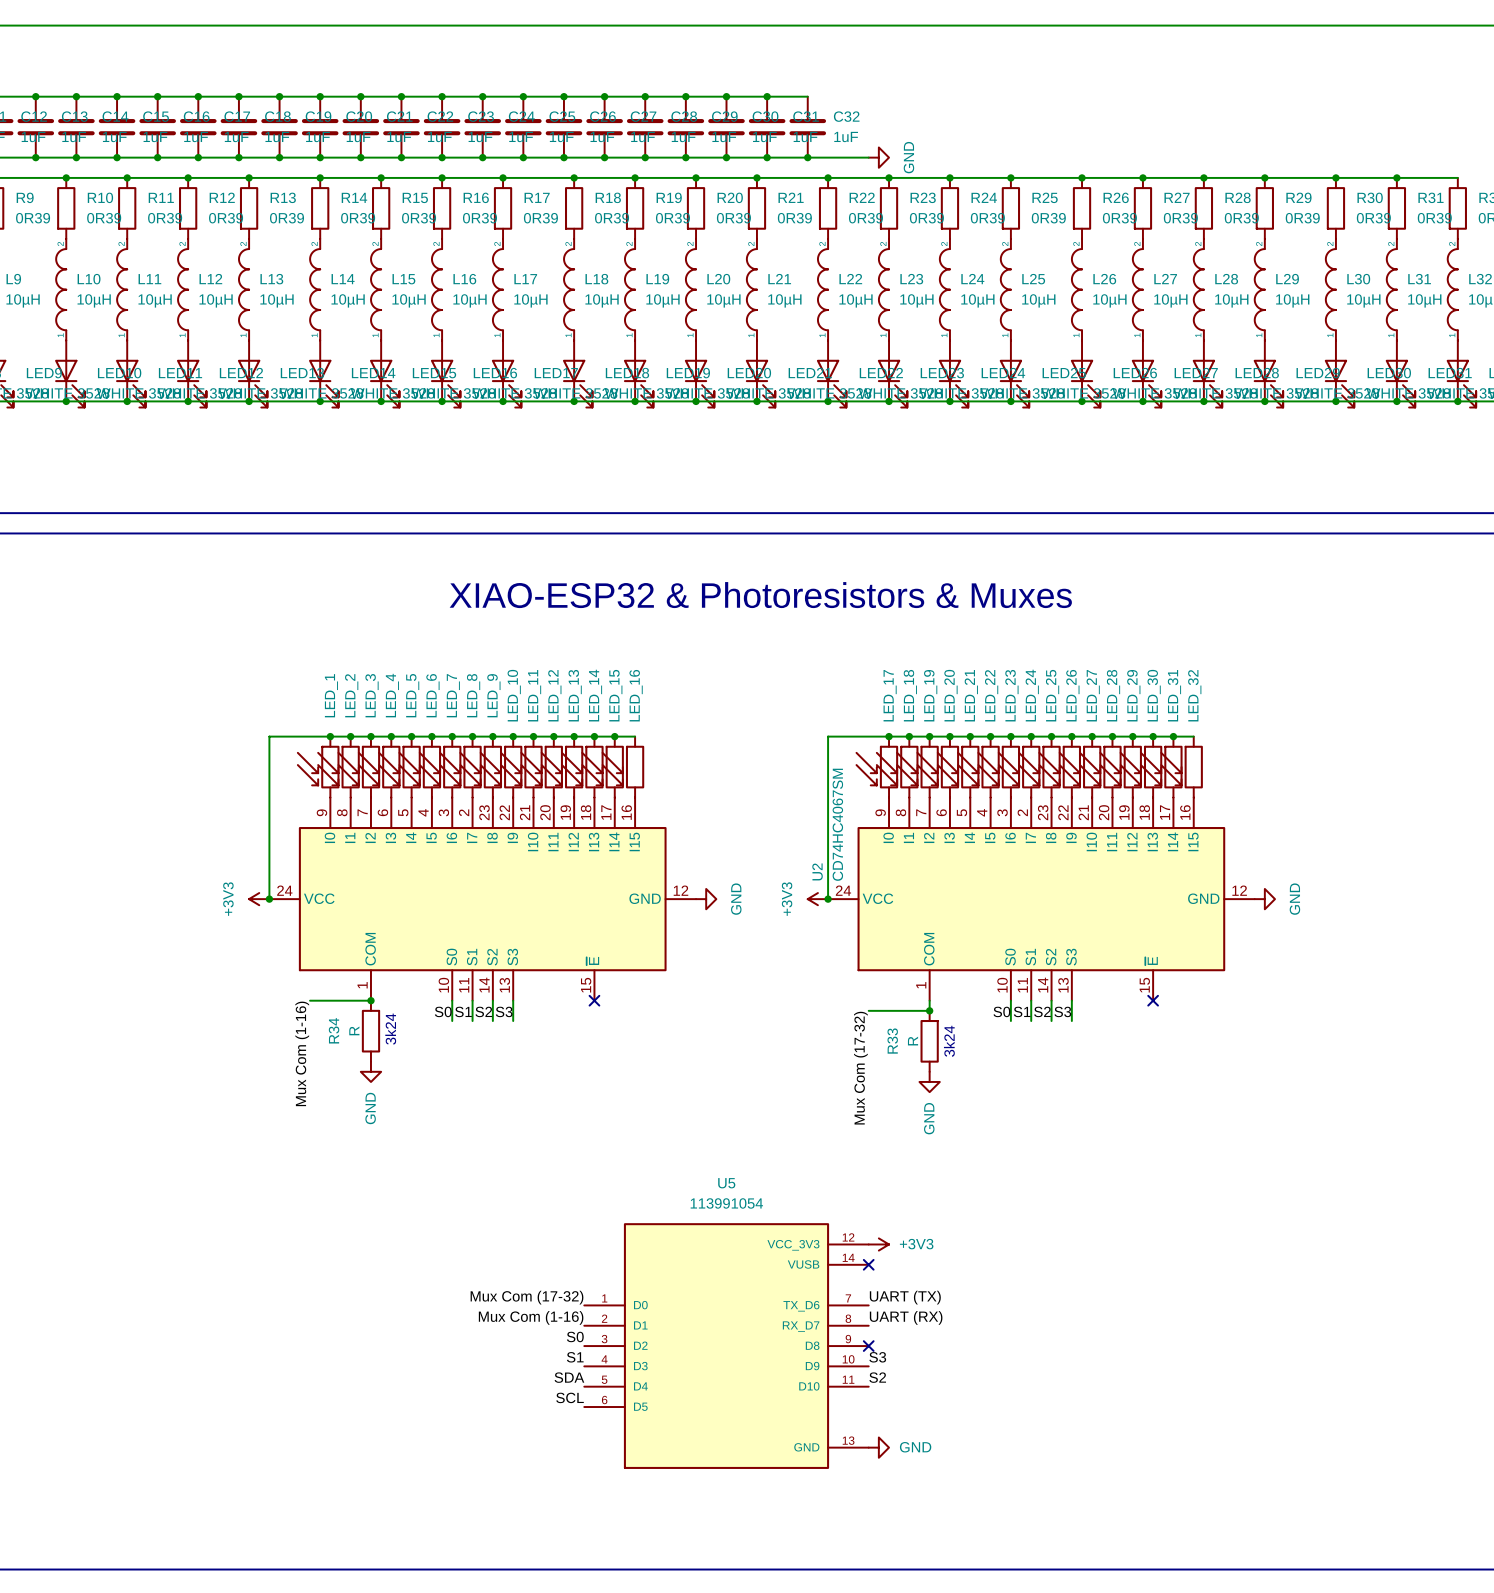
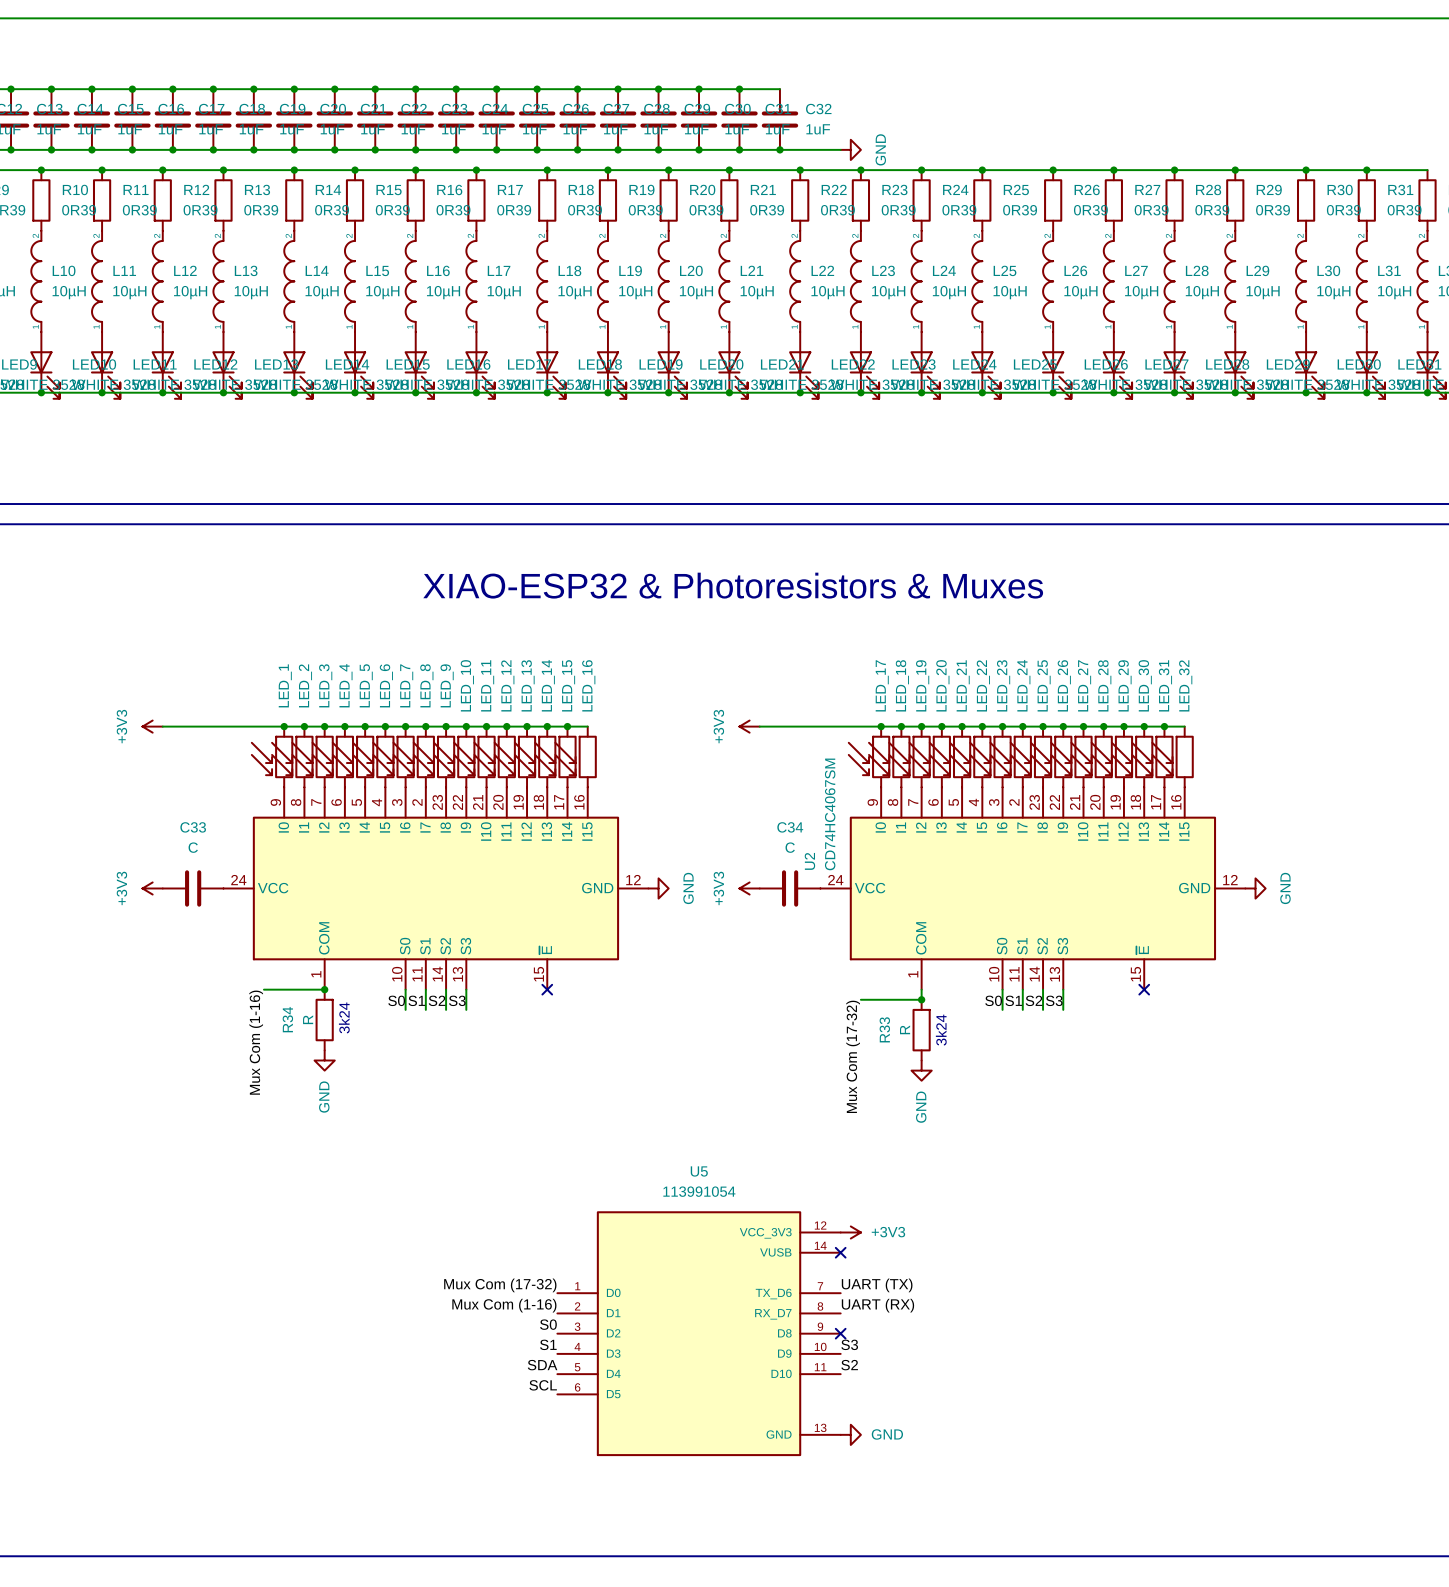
LED_1 name: LED_1 (331, 695) -> LED_2 (305, 685)
LED_2 name: LED_2 (351, 695) -> LED_3 (325, 685)
LED_3 name: LED_3 (372, 695) -> LED_4 (345, 685)
LED_4 name: LED_4 (392, 695) -> LED_5 (366, 685)
LED_5 name: LED_5 (412, 695) -> LED_6 (386, 685)
LED_6 name: LED_6 (432, 695) -> LED_7 (406, 685)
LED_7 name: LED_7 (453, 695) -> LED_8 (426, 685)
LED_8 name: LED_8 (473, 695) -> LED_9 (447, 685)
LED_9 name: LED_9 (493, 695) -> LED_10 (467, 685)
LED_10 name: LED_10 (514, 695) -> LED_11 (487, 685)
LED_11 name: LED_11 (534, 695) -> LED_12 (507, 685)
LED_12 name: LED_12 (554, 695) -> LED_13 (528, 685)
LED_13 name: LED_13 (575, 695) -> LED_14 (548, 685)
LED_14 name: LED_14 (595, 695) -> LED_15 (568, 685)
LED_15 name: LED_15 (615, 695) -> LED_16 (588, 685)
LED_18 name: LED_18 (910, 695) -> LED_17 (882, 685)
LED_19 name: LED_19 (930, 695) -> LED_18 (902, 685)
LED_20 name: LED_20 (950, 695) -> LED_19 (922, 685)
LED_21 name: LED_21 (971, 695) -> LED_20 (942, 685)
LED_22 name: LED_22 (991, 695) -> LED_21 (963, 685)
LED_23 name: LED_23 (1011, 695) -> LED_22 (983, 685)
LED_24 name: LED_24 (1032, 695) -> LED_23 (1003, 685)
LED_25 name: LED_25 (1052, 695) -> LED_24 (1023, 685)
LED_26 name: LED_26 (1072, 695) -> LED_25 (1044, 685)
LED_27 name: LED_27 (1093, 695) -> LED_26 (1064, 685)
LED_28 name: LED_28 (1113, 695) -> LED_27 (1084, 685)
LED_29 name: LED_29 (1133, 695) -> LED_28 (1104, 685)
LED_30 name: LED_30 (1154, 695) -> LED_29 (1124, 685)
LED_31 name: LED_31 (1174, 695) -> LED_30 (1145, 685)
LED_32 name: LED_32 (1194, 695) -> LED_31 (1165, 685)
power symbol: none -> +3V3 (152, 726)
wire: (269, 736) (269, 899) -> (243, 726) (162, 726)
junction: none -> (284, 726)
wire: (614, 736) (635, 736) -> none
junction: (614, 736) -> none
power symbol: none -> +3V3 (749, 726)
wire: (828, 736) (828, 899) -> (800, 726) (759, 726)
junction: (889, 736) -> none
wire: none -> (1164, 726) (1184, 726)
junction: none -> (1164, 726)
LED_1: none -> (272, 756)
LED_16: (623, 767) -> none
LED_17: (877, 767) -> none
LED_32: none -> (1173, 756)
C33: none -> C (193, 888)
power symbol position: +3V3 (259, 899) -> +3V3 (152, 888)
junction: (269, 899) -> none
part position: (482, 899) -> (435, 888)
power symbol position: GND (706, 899) -> GND (658, 888)
C34: none -> C (790, 888)
power symbol position: +3V3 (817, 899) -> +3V3 (749, 888)
junction: (828, 899) -> none
U2 position: (1041, 899) -> (1032, 888)
power symbol position: GND (1264, 899) -> GND (1255, 888)
wire: (350, 1000) (370, 1000) -> (263, 989) (284, 989)
junction position: (370, 1000) -> (324, 989)
wire: (513, 1000) (513, 1021) -> (405, 989) (405, 1009)
no-connect mark position: (594, 1000) -> (547, 989)
wire: (929, 1000) (929, 1010) -> (921, 989) (921, 999) (901, 999)
wire: (1010, 1000) (1010, 1021) -> (1063, 989) (1063, 1009)
no-connect mark position: (1153, 1000) -> (1144, 989)
wire: (868, 1010) (889, 1010) -> none
junction position: (929, 1010) -> (921, 999)
label: none -> S0 (396, 1000)
label: S0 (443, 1011) -> S1 (416, 1000)
label: S1 (463, 1011) -> S2 (437, 1000)
label: S2 (483, 1011) -> S3 (457, 1000)
label: S3 (504, 1011) -> none
label: S0 (1001, 1011) -> none
label: S1 (1022, 1011) -> S0 (993, 1000)
label: S2 (1042, 1011) -> S1 (1013, 1000)
label: S3 (1062, 1011) -> S2 (1034, 1000)
label: none -> S3 (1054, 1000)
text position: 3k24 (390, 1029) -> 3k24 (344, 1017)
R34 position: (370, 1031) -> (324, 1020)
R33 position: (929, 1041) -> (921, 1030)
text position: 3k24 (949, 1041) -> 3k24 (941, 1030)
label position: Mux Com (1-16) (302, 1053) -> Mux Com (1-16) (256, 1042)
label position: Mux Com (17-32) (860, 1068) -> Mux Com (17-32) (853, 1056)
power symbol position: GND (370, 1071) -> GND (324, 1060)
power symbol position: GND (929, 1081) -> GND (921, 1070)

